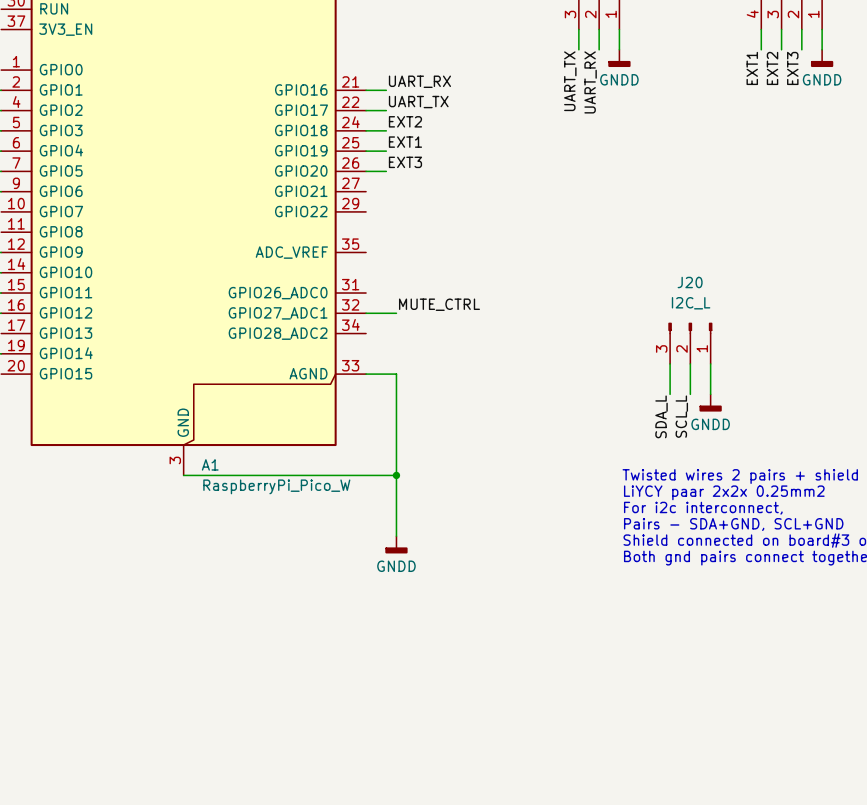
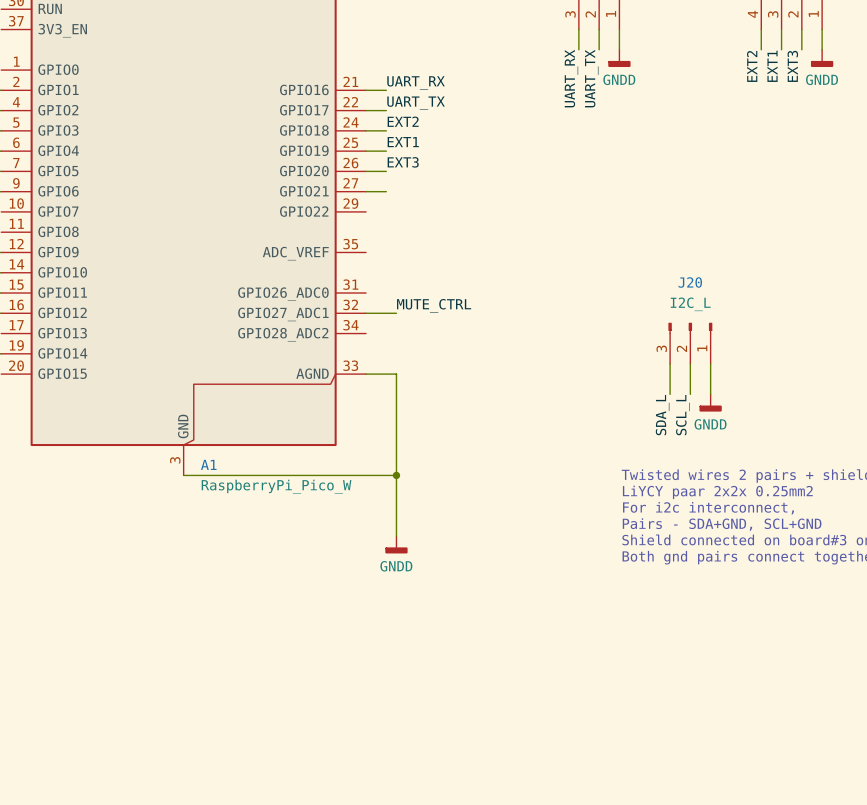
label: EXT1 (752, 68) -> EXT2 (752, 66)
label: EXT2 (772, 68) -> EXT1 (772, 66)
label: UART_TX (570, 81) -> UART_RX (571, 78)
label: UART_RX (590, 82) -> UART_TX (591, 78)
wire: none -> (366, 191) (386, 191)

